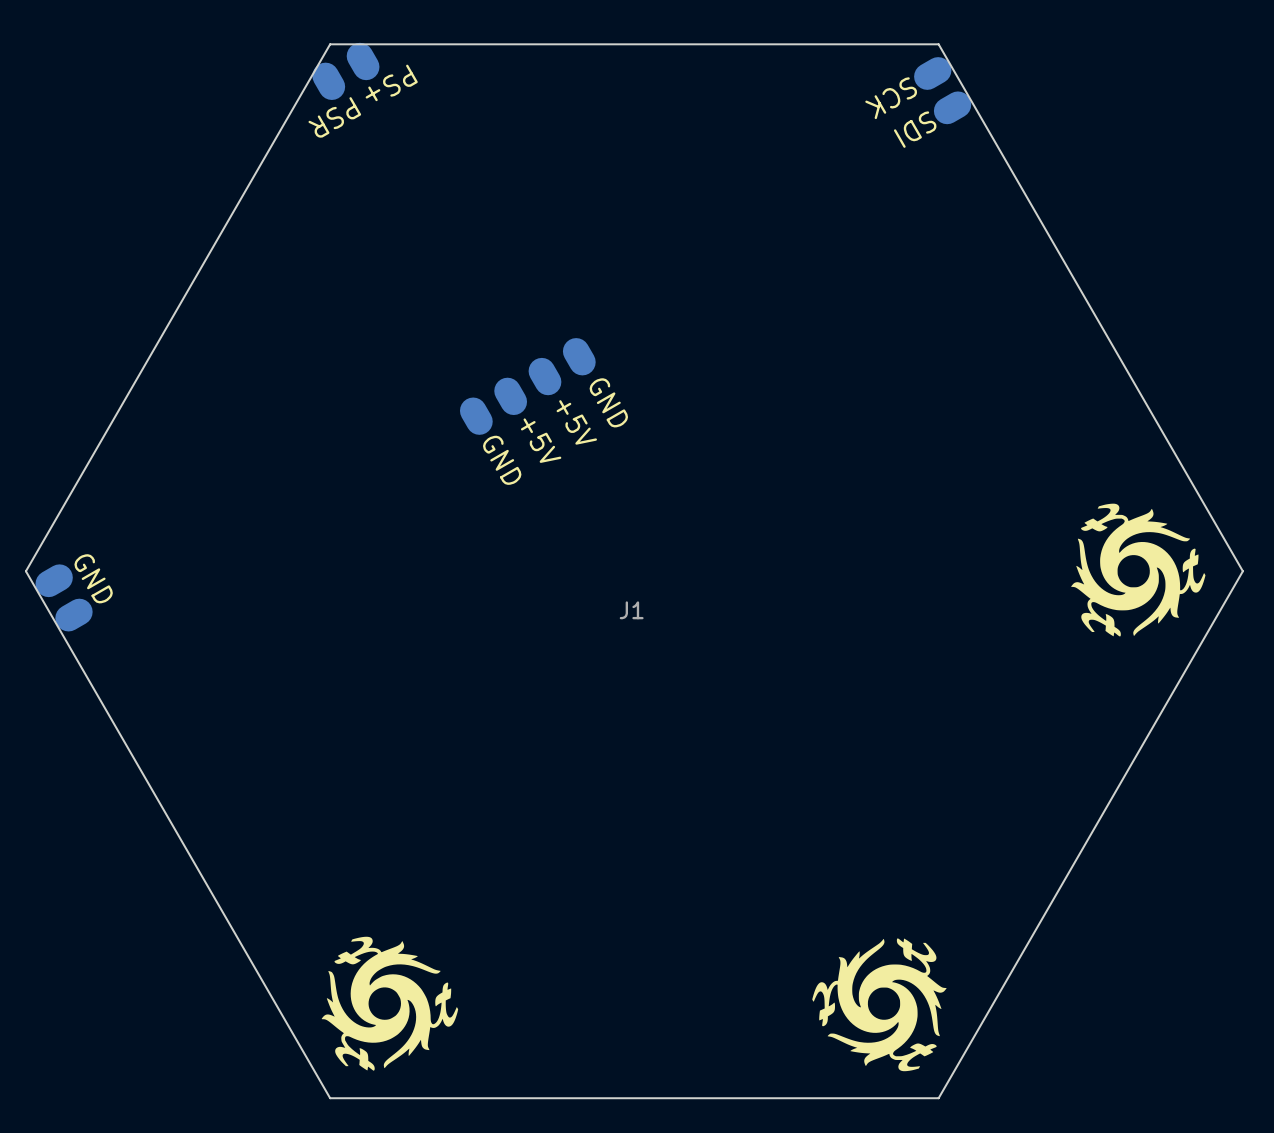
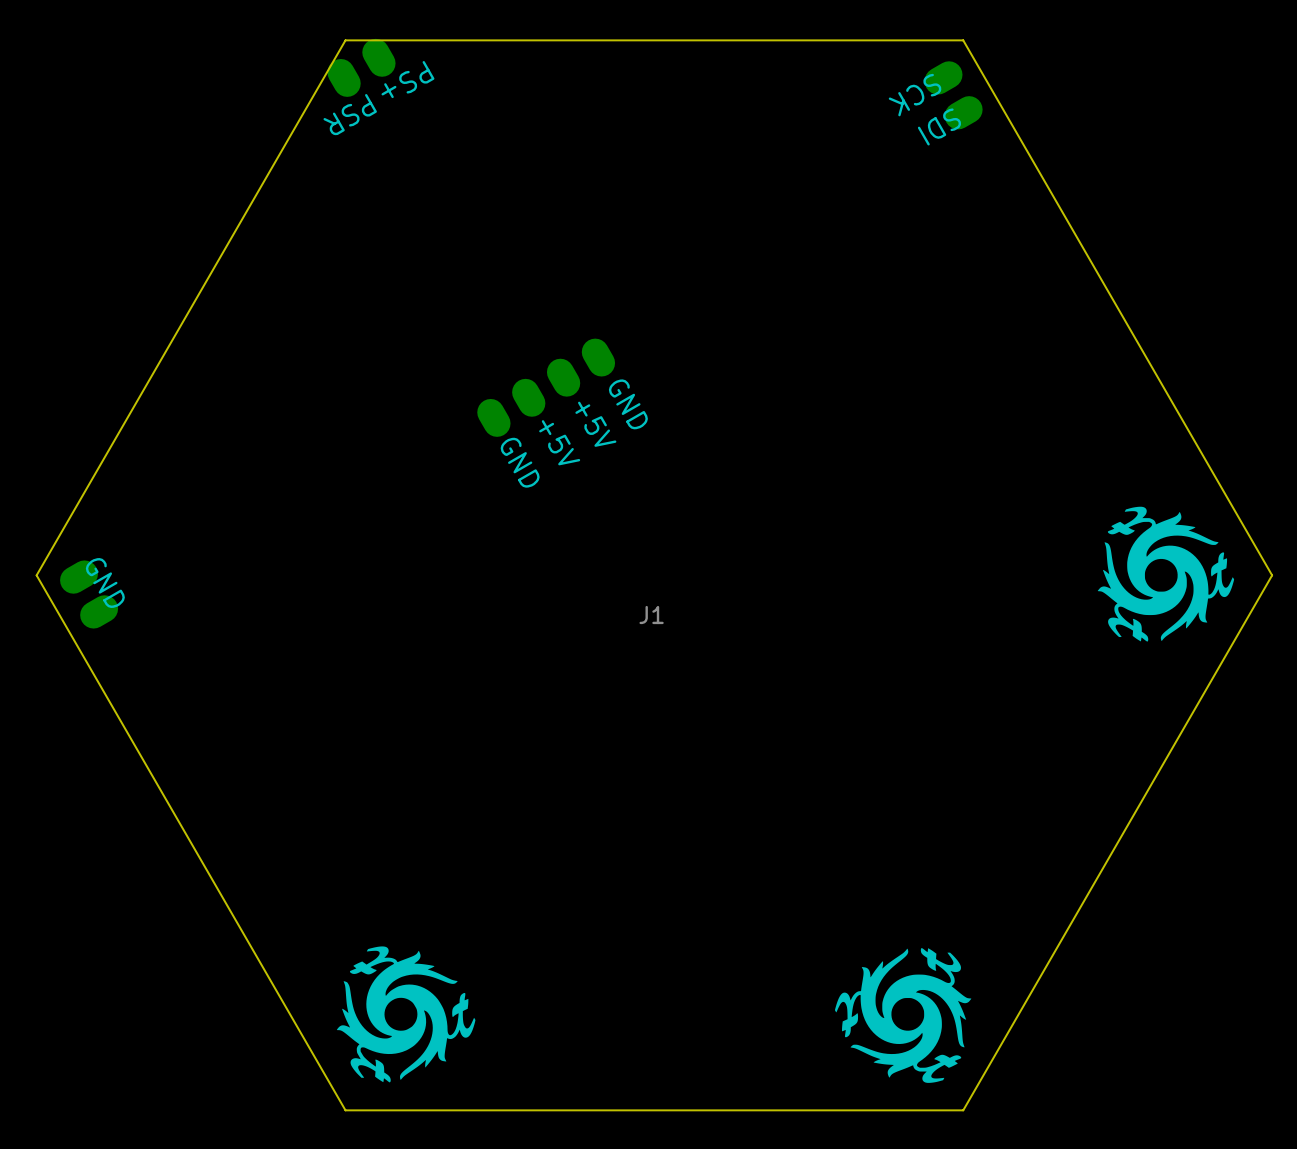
J1 footprint: [35, 42, 972, 632] -> [60, 38, 983, 629]

